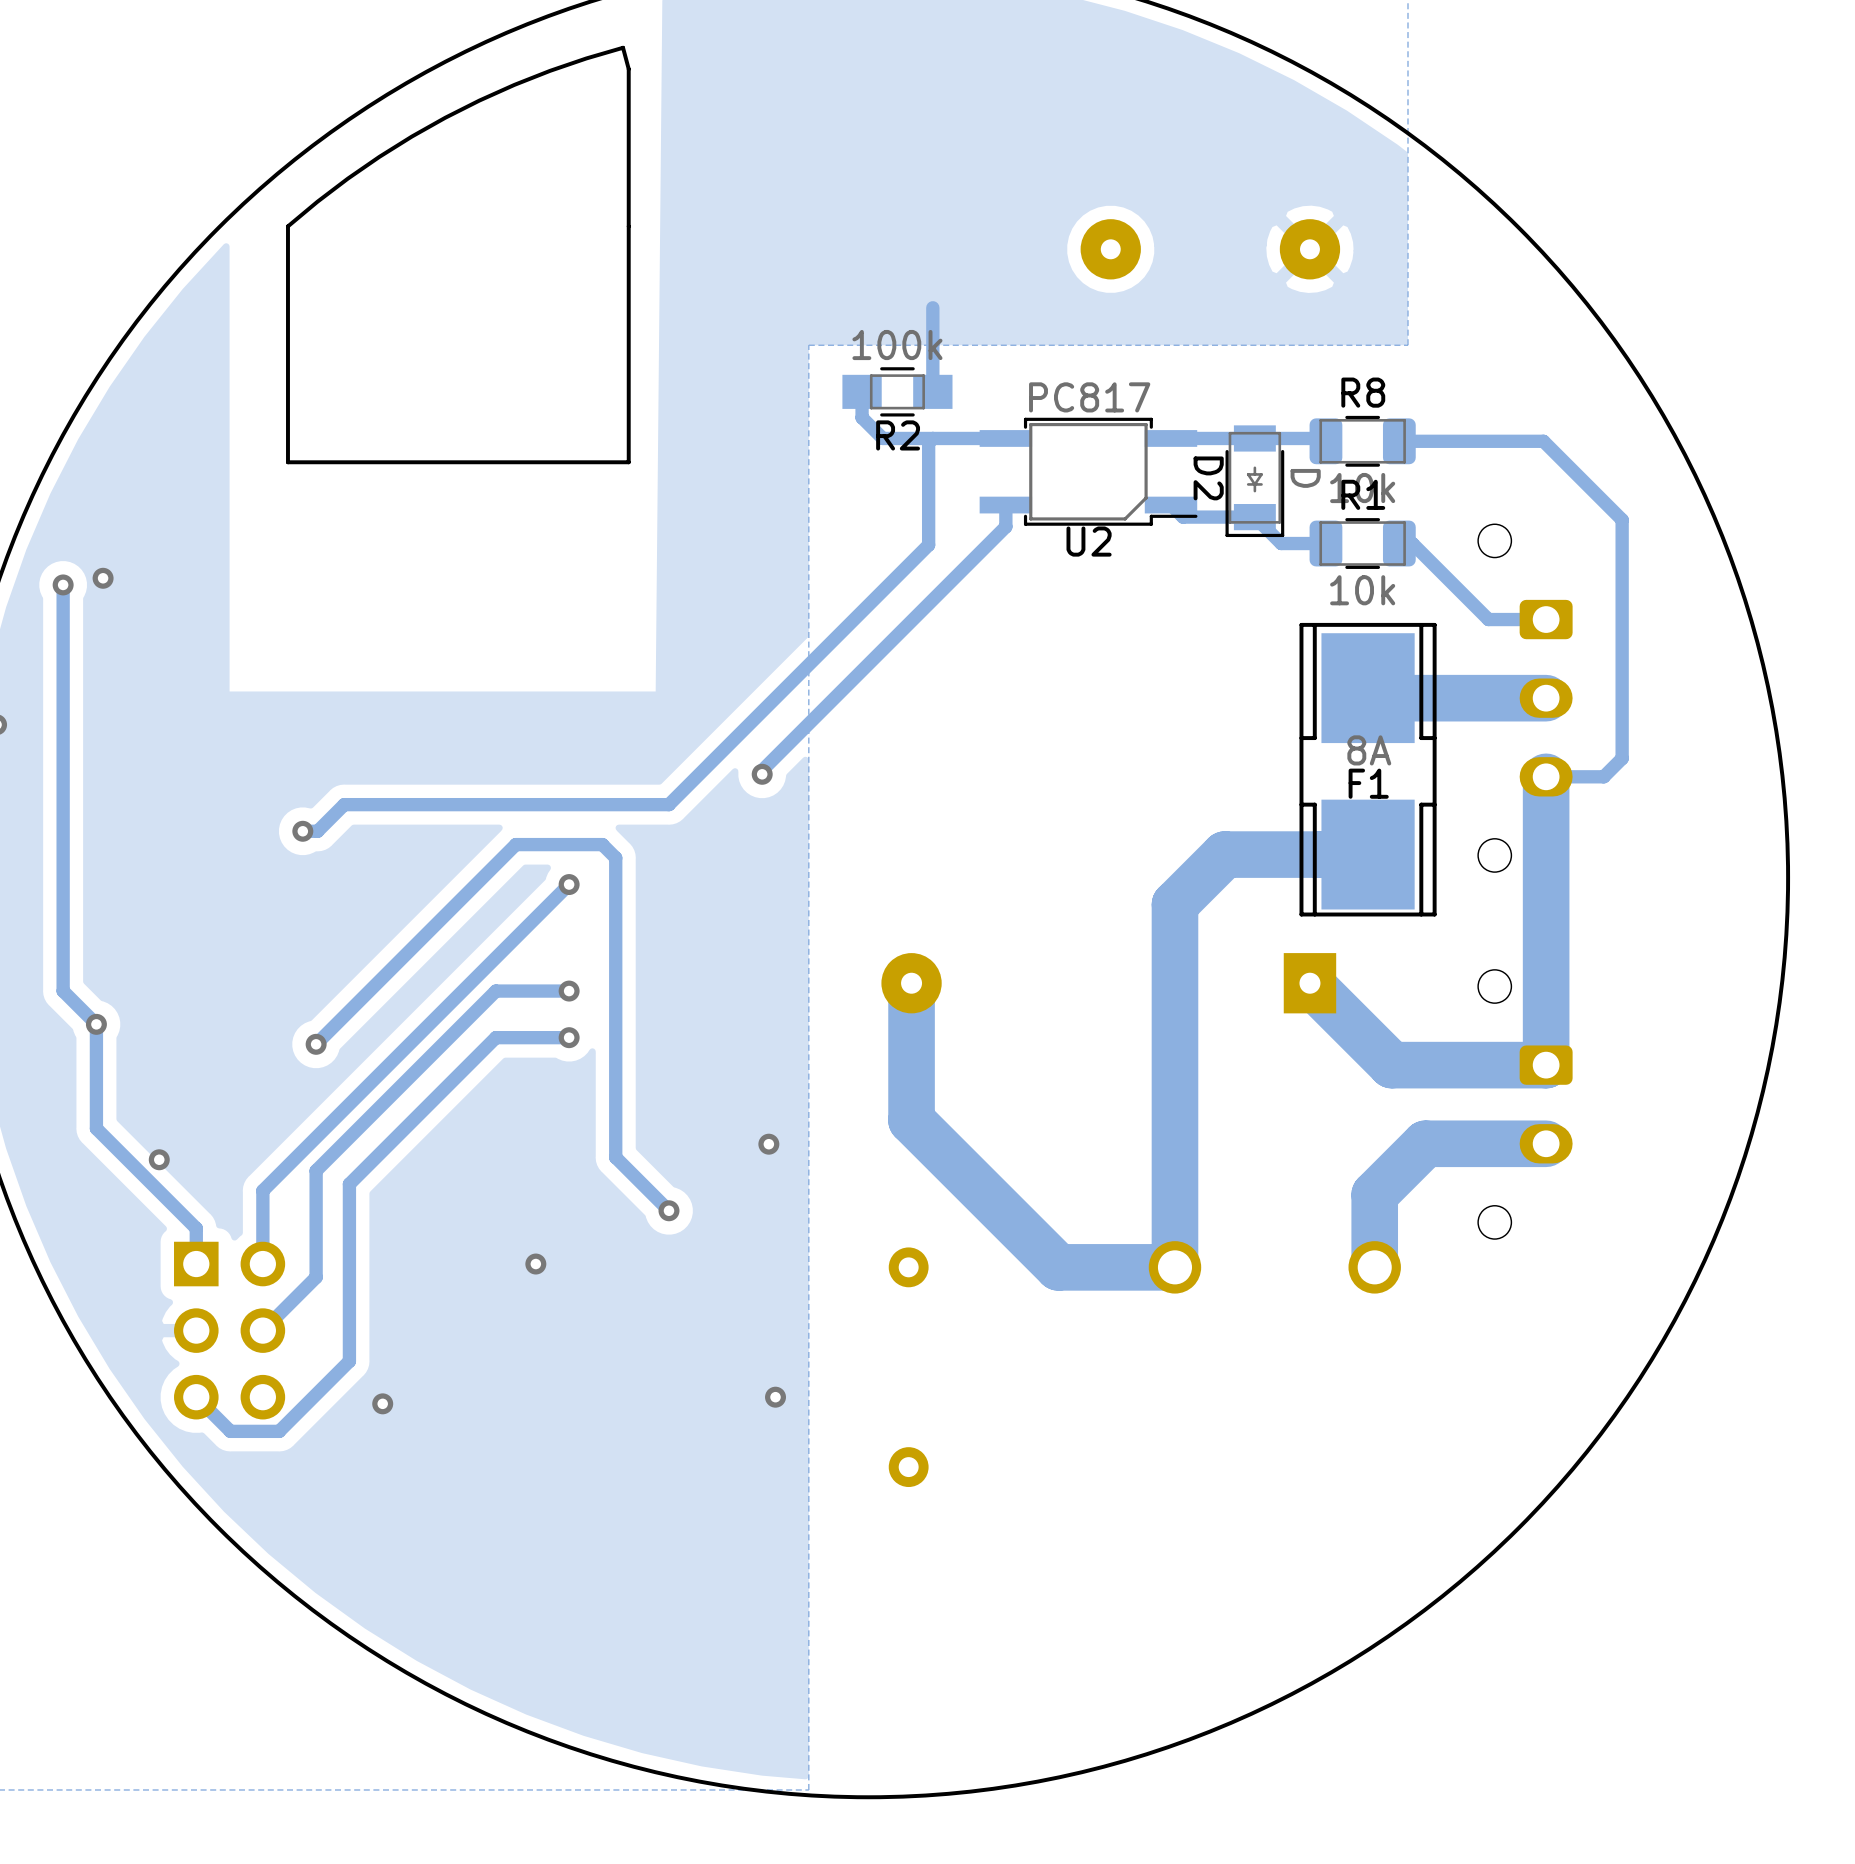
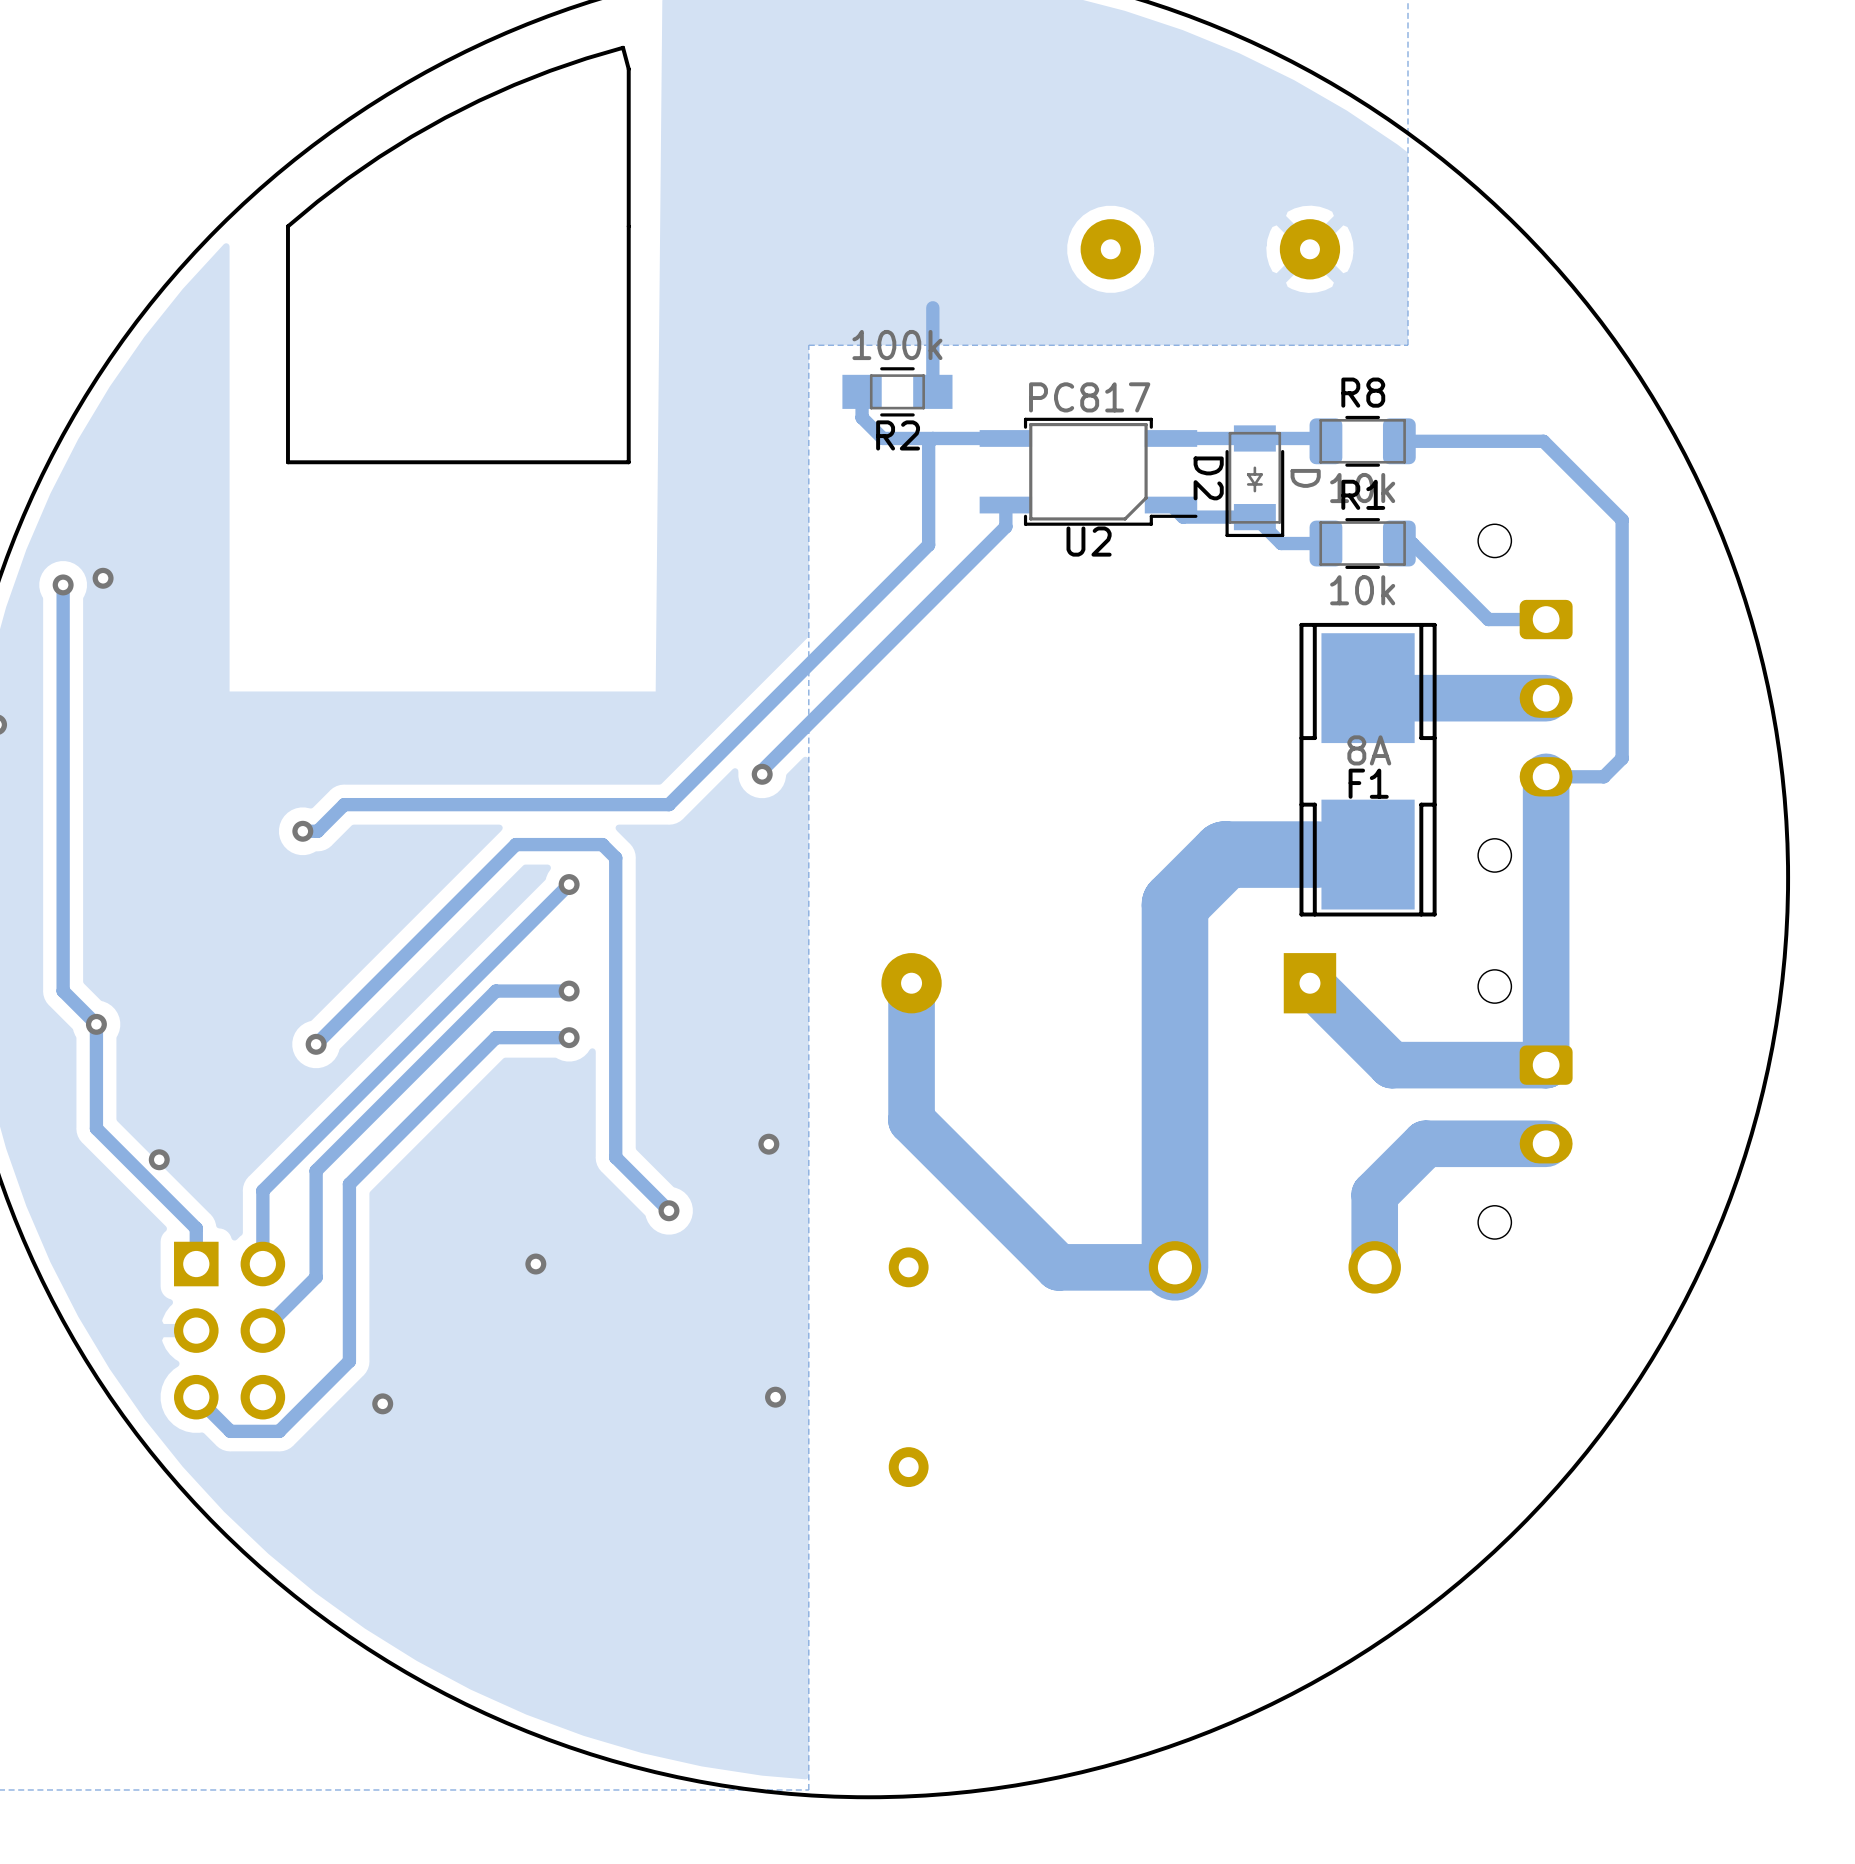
track width: thin (1318, 854) (1224, 854) (1174, 904) (1174, 1267) -> thick (1318, 854) (1224, 854) (1174, 904) (1174, 1267)

